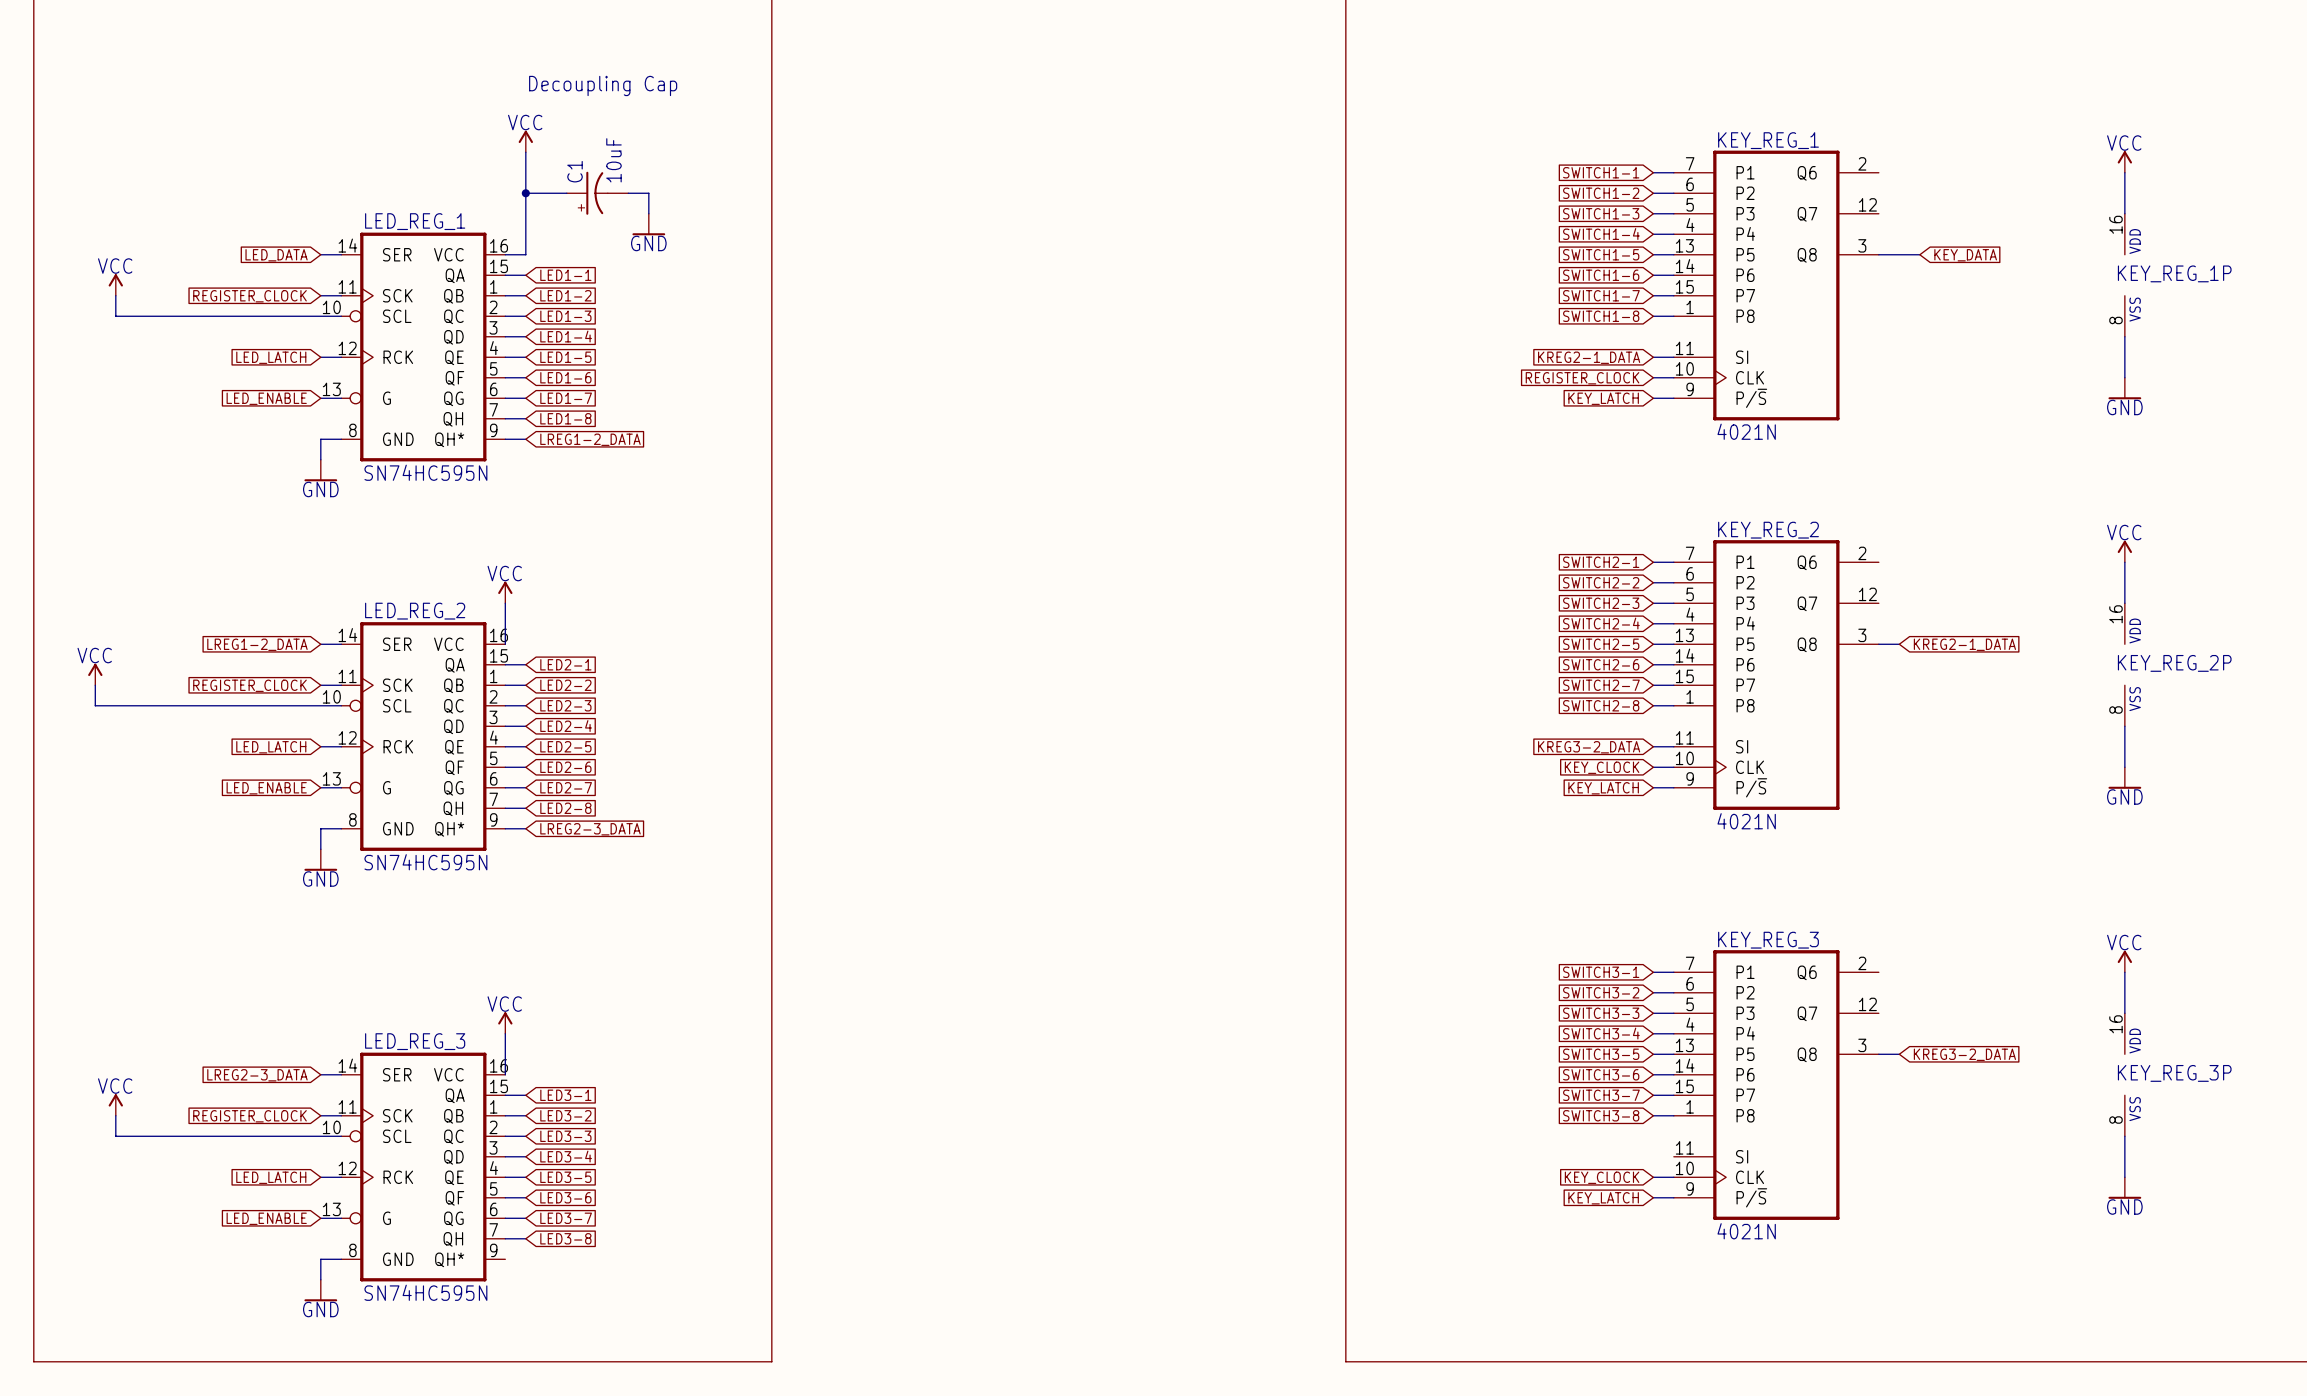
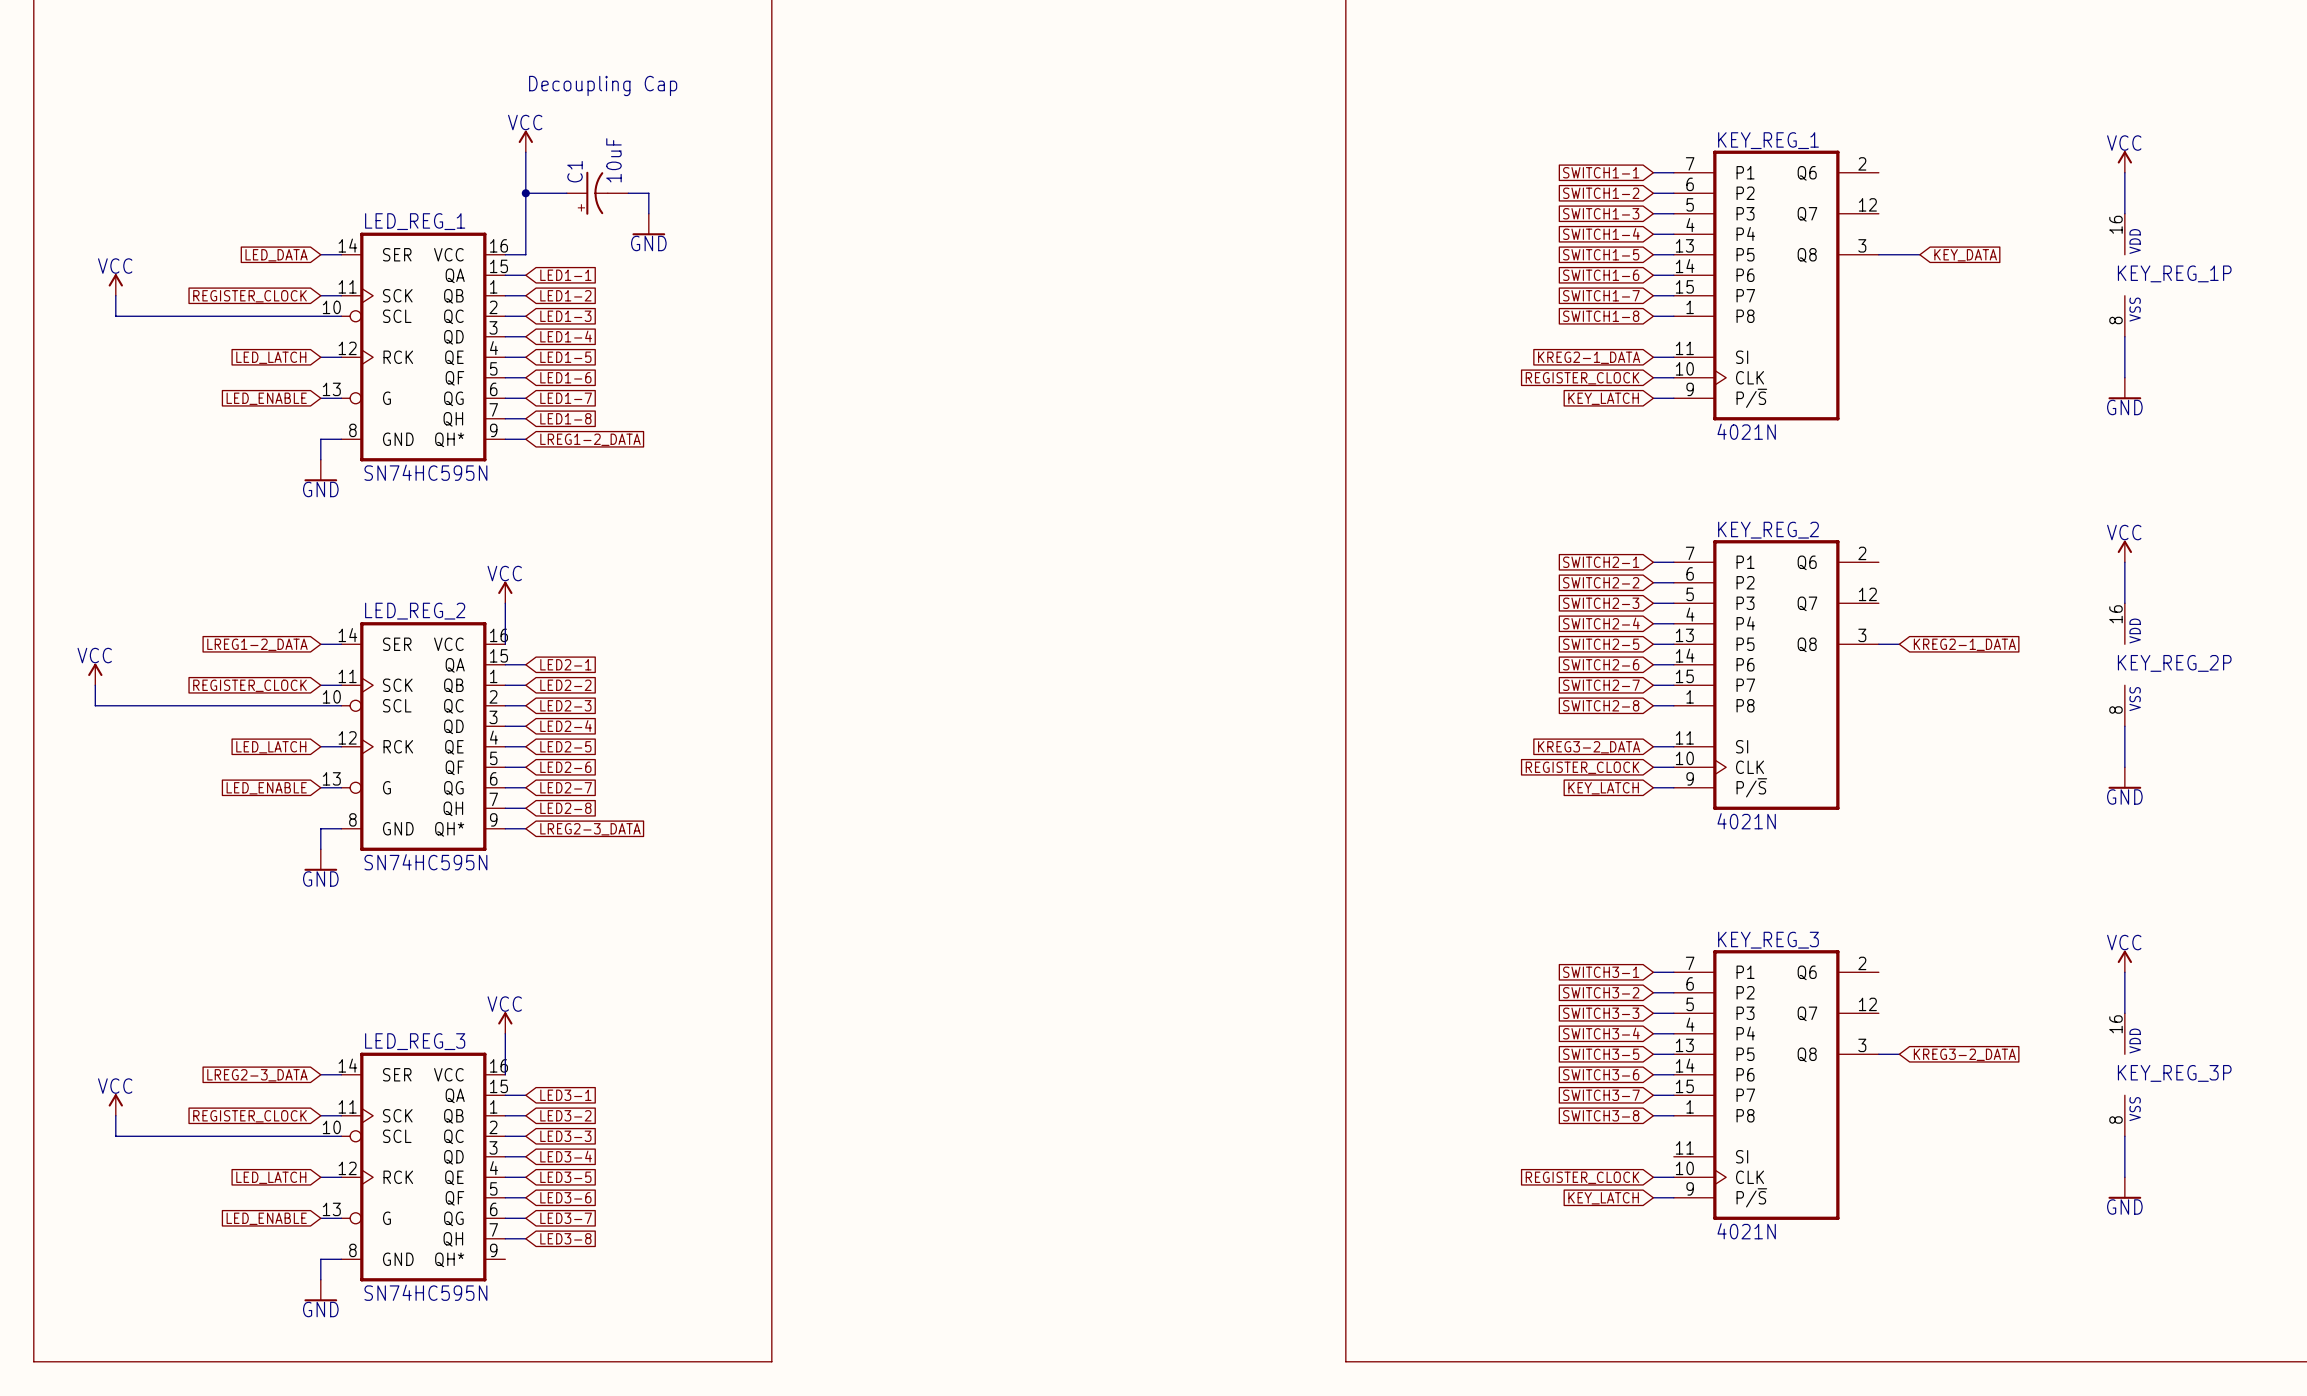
global label: KEY_CLOCK (1602, 767) -> REGISTER_CLOCK (1582, 767)
global label: KEY_CLOCK (1602, 1177) -> REGISTER_CLOCK (1582, 1177)

